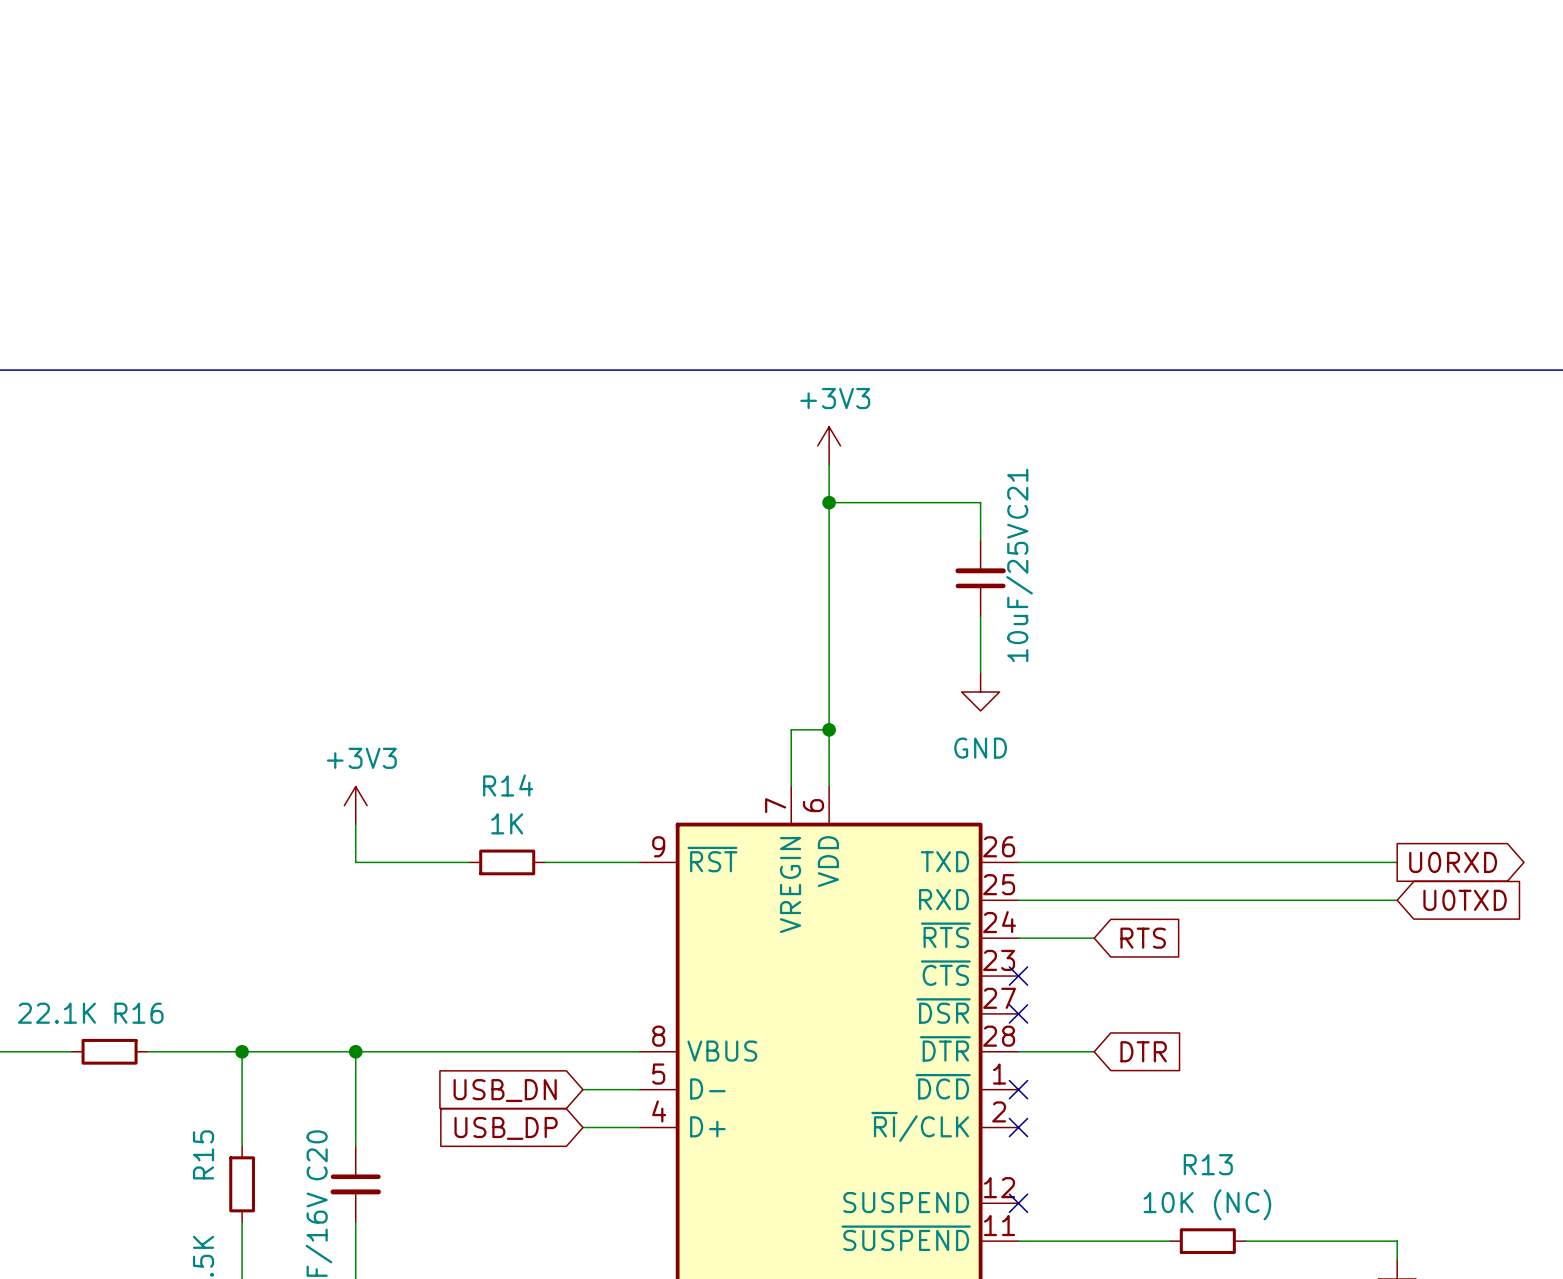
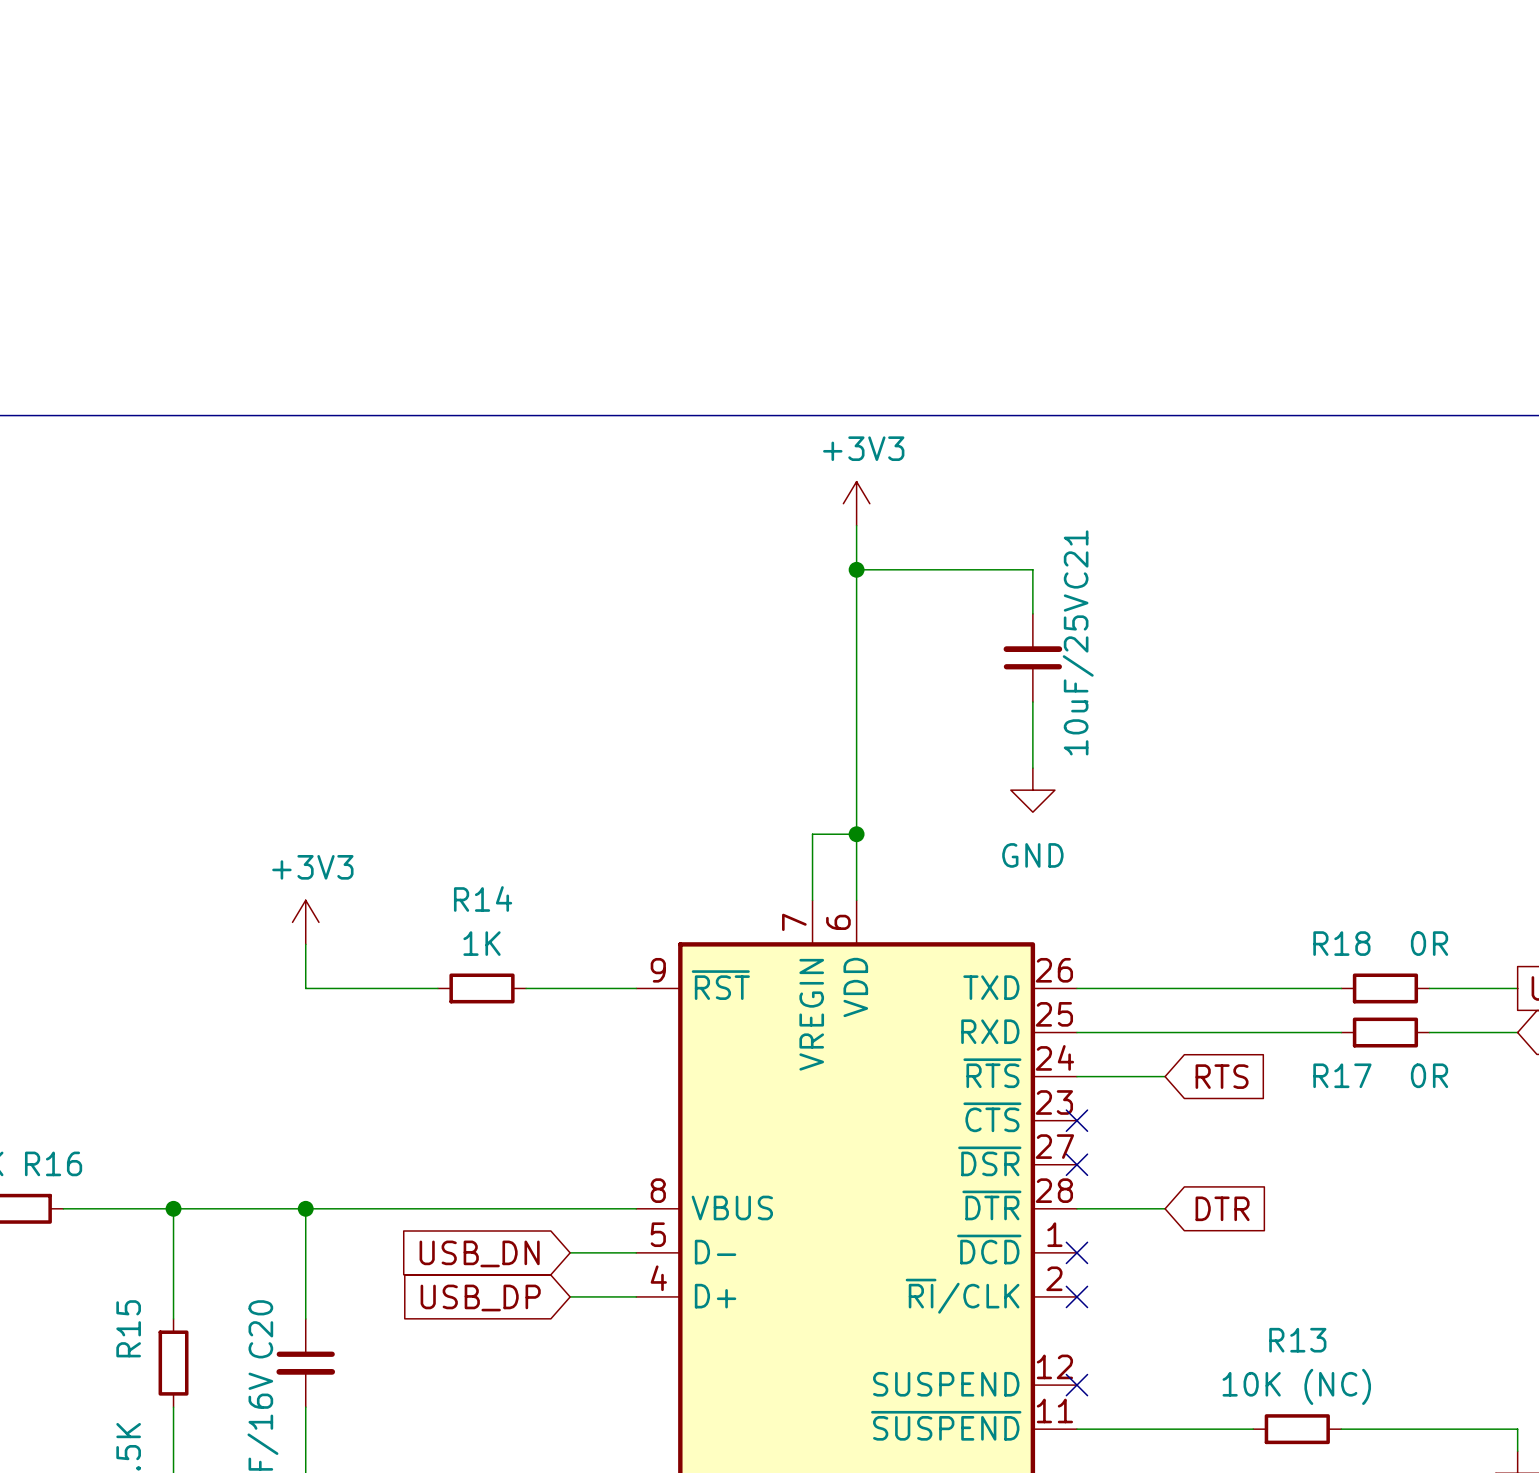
wire: (1245, 862) (1321, 862) -> none
R17: none -> 0R (1385, 988)
wire: (1245, 900) (1321, 900) -> none
R18: none -> 0R (1385, 1032)

